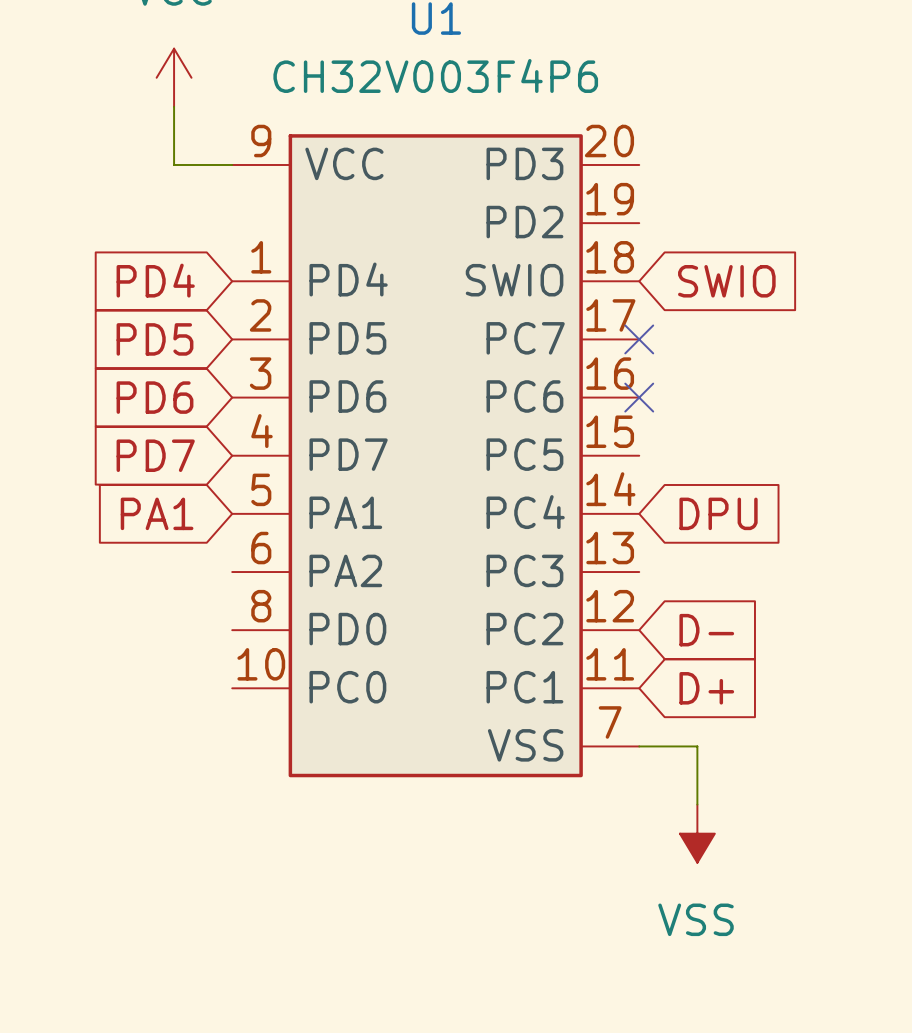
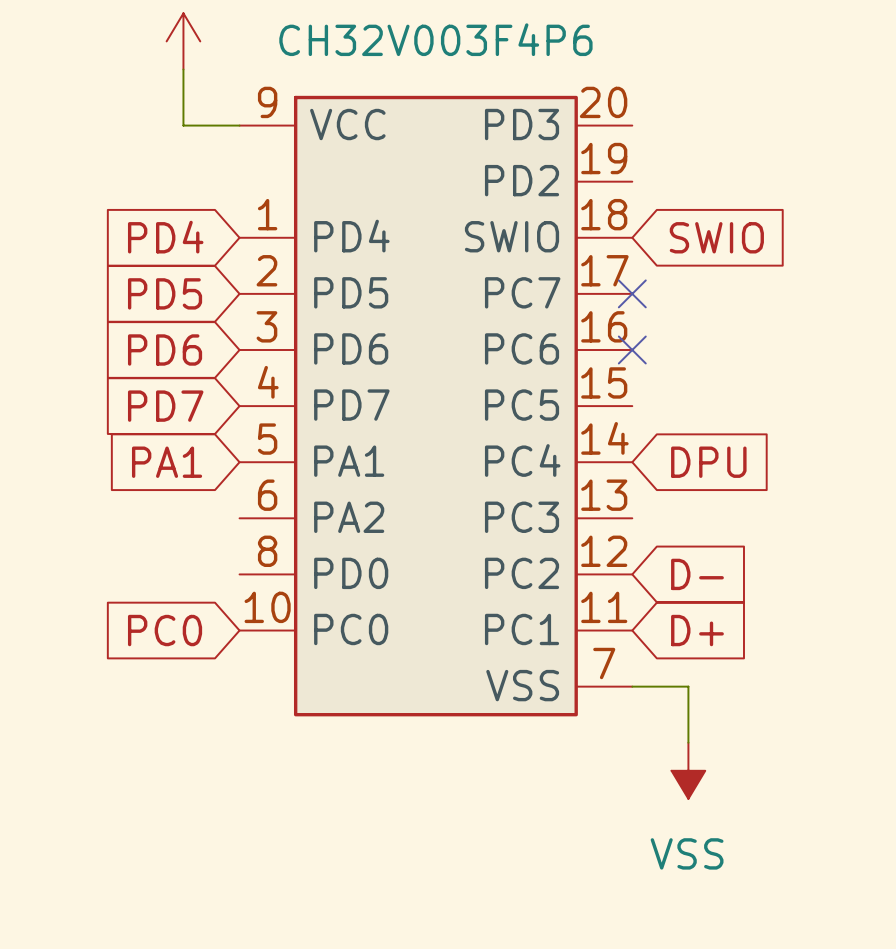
global label: none -> PC0 (165, 630)

